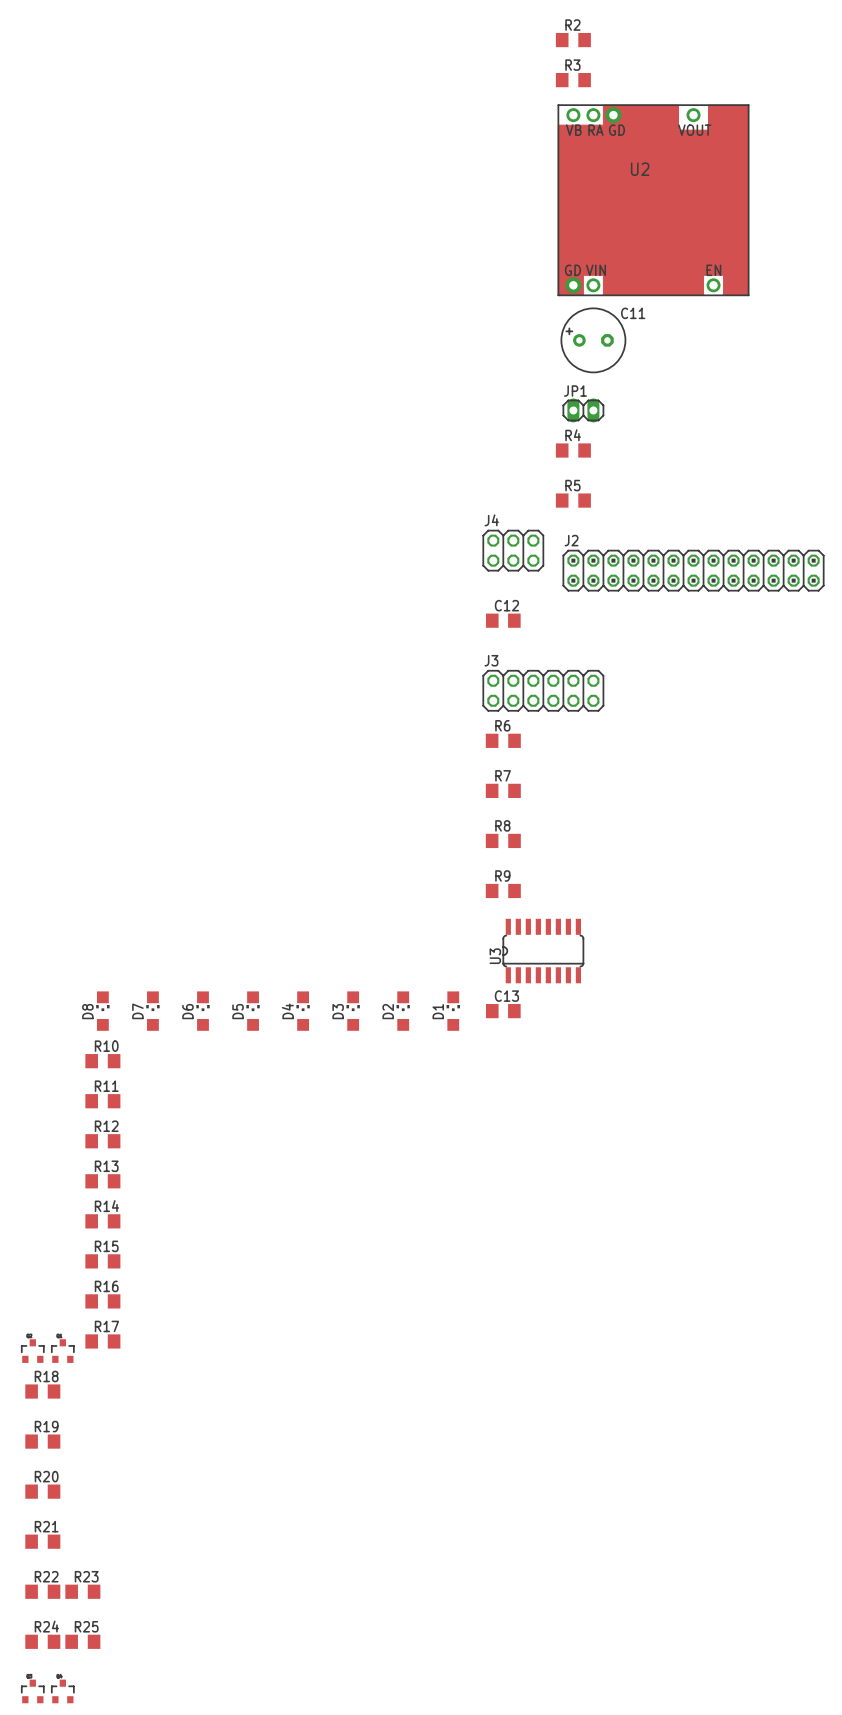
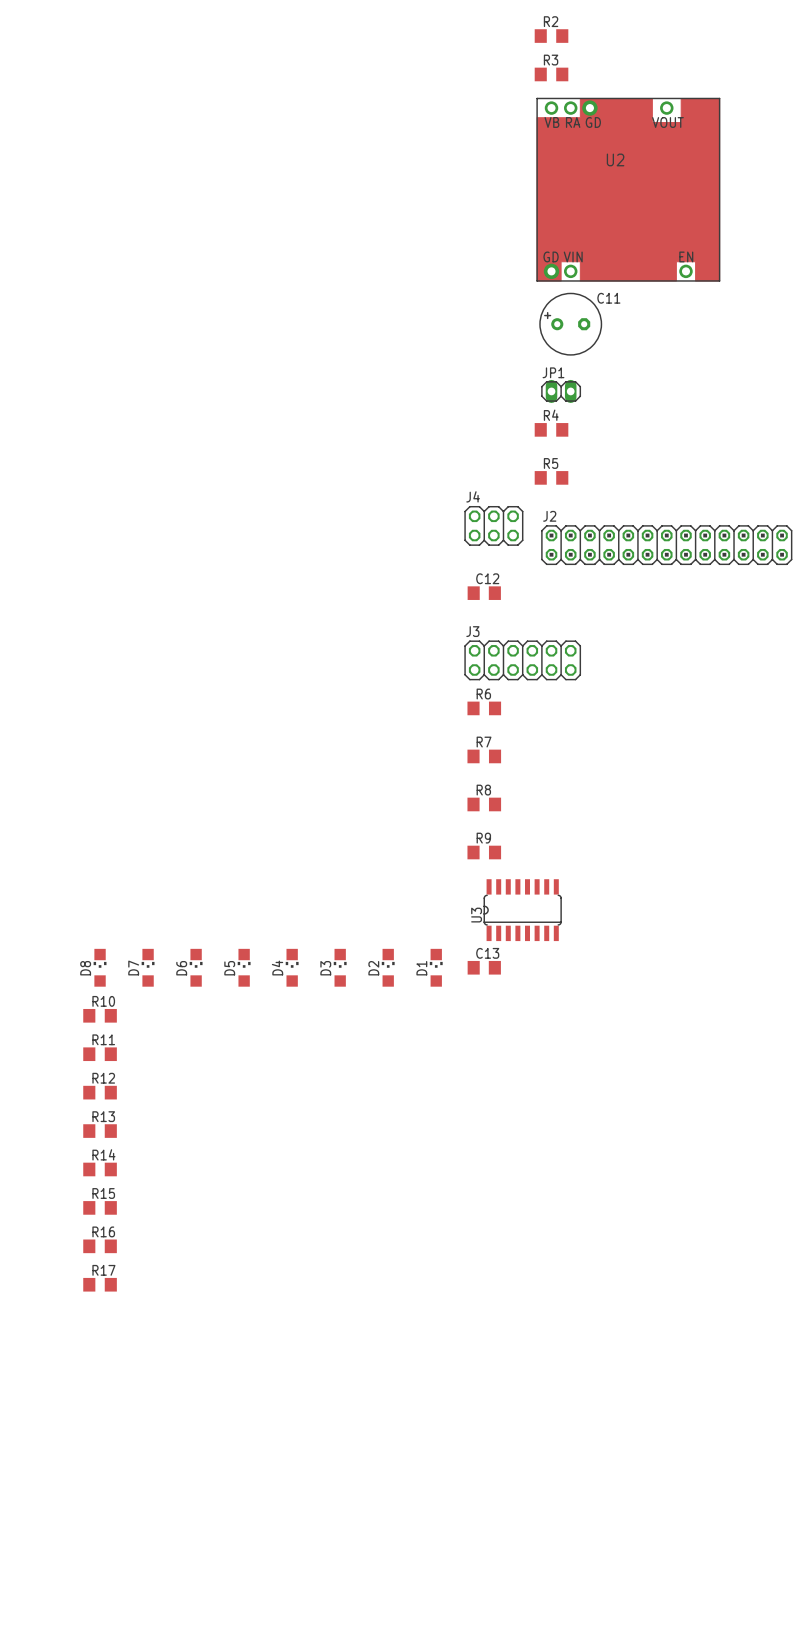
part: (32, 1351) -> none
part: (62, 1351) -> none
R18: (42, 1391) -> none
R19: (42, 1441) -> none
R20: (42, 1491) -> none
R21: (42, 1541) -> none
R22: (42, 1591) -> none
R23: (82, 1591) -> none
R24: (42, 1641) -> none
R25: (82, 1641) -> none
part: (32, 1691) -> none
part: (62, 1691) -> none

